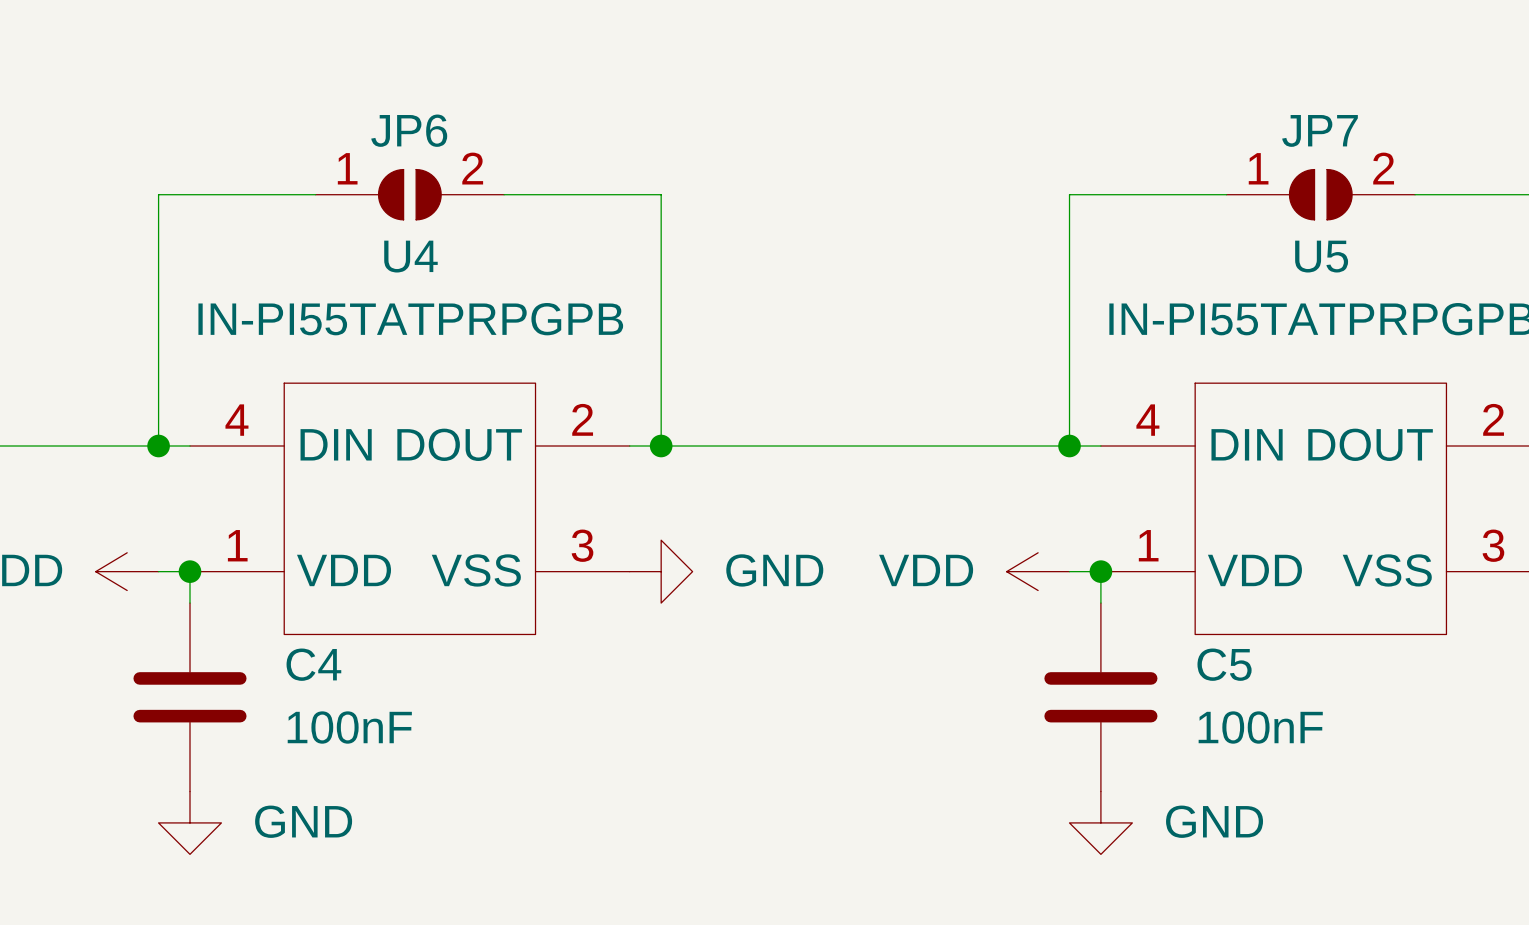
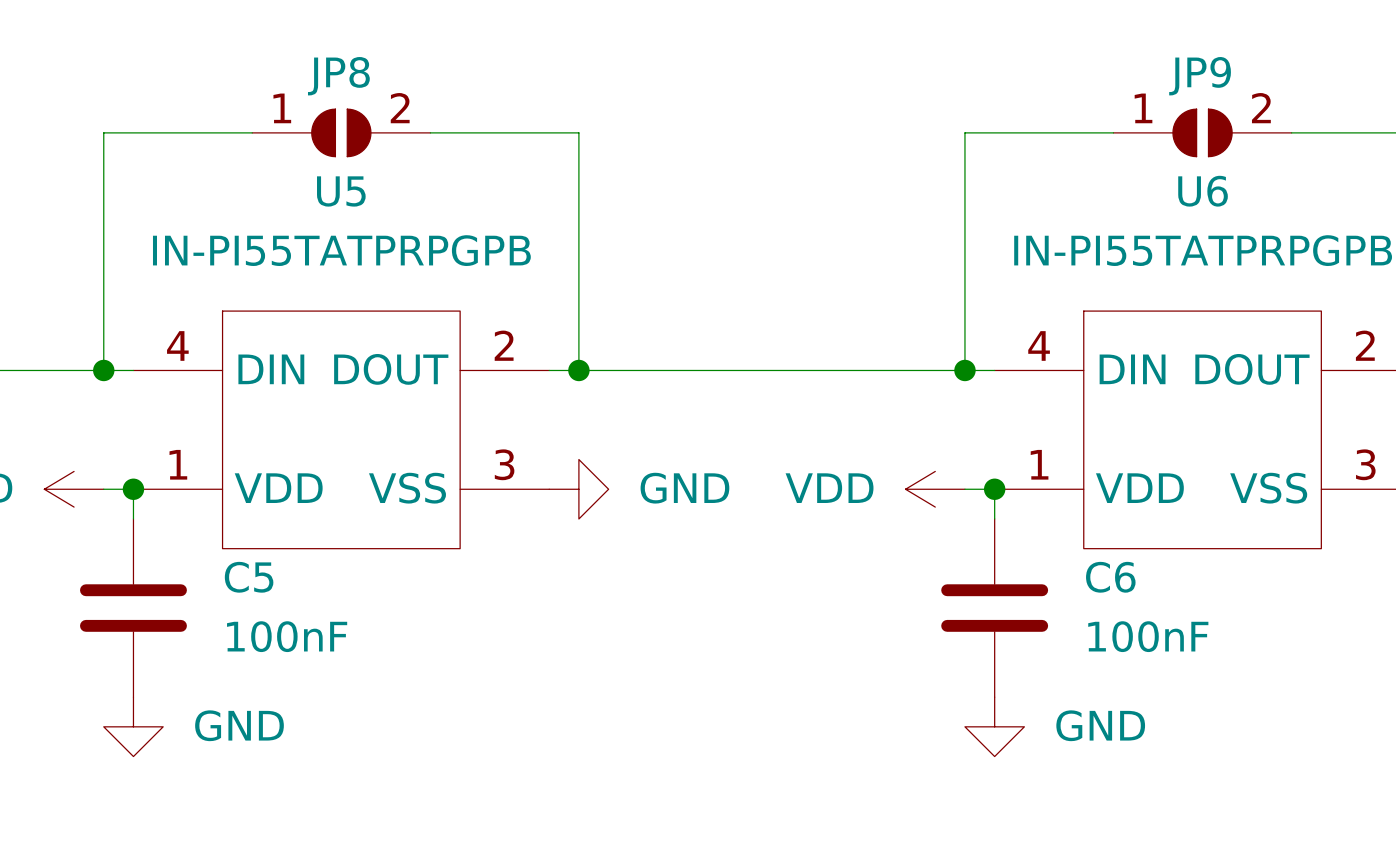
JP6 name: JP6 (409, 130) -> JP8 (338, 76)
JP7 name: JP7 (1320, 130) -> JP9 (1200, 76)
U4 name: U4 (410, 256) -> U5 (341, 191)
U5 name: U5 (1321, 256) -> U6 (1203, 191)
C4 name: C4 (313, 664) -> C5 (249, 577)
C5 name: C5 (1224, 664) -> C6 (1110, 577)

